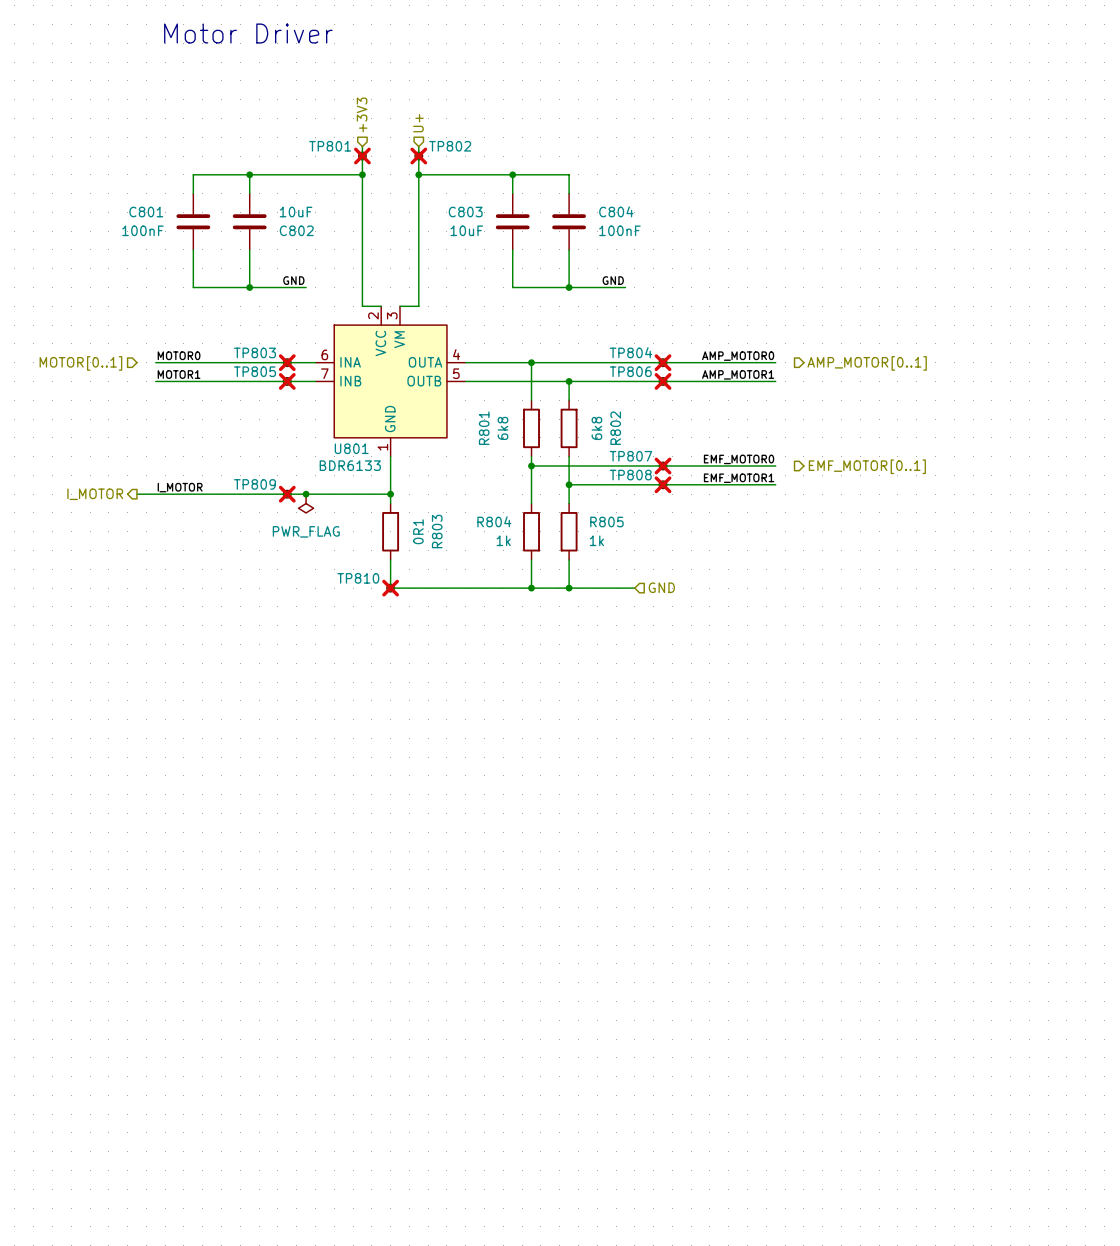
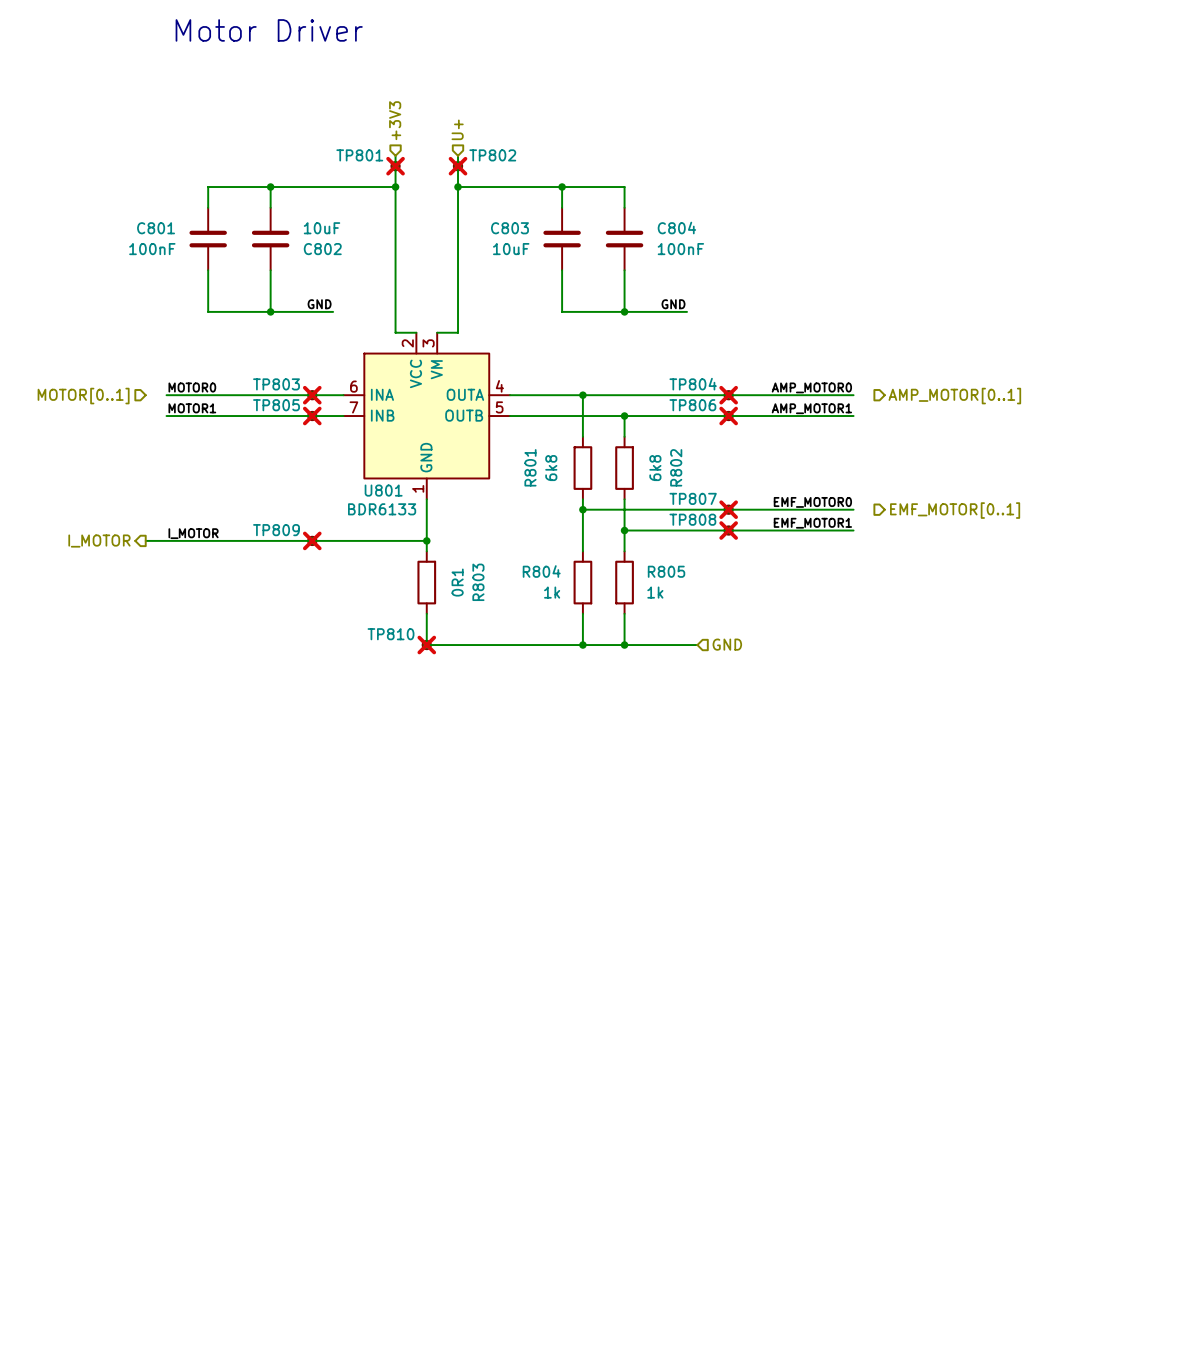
junction: (306, 494) -> none
power symbol: PWR_FLAG (306, 503) -> none

